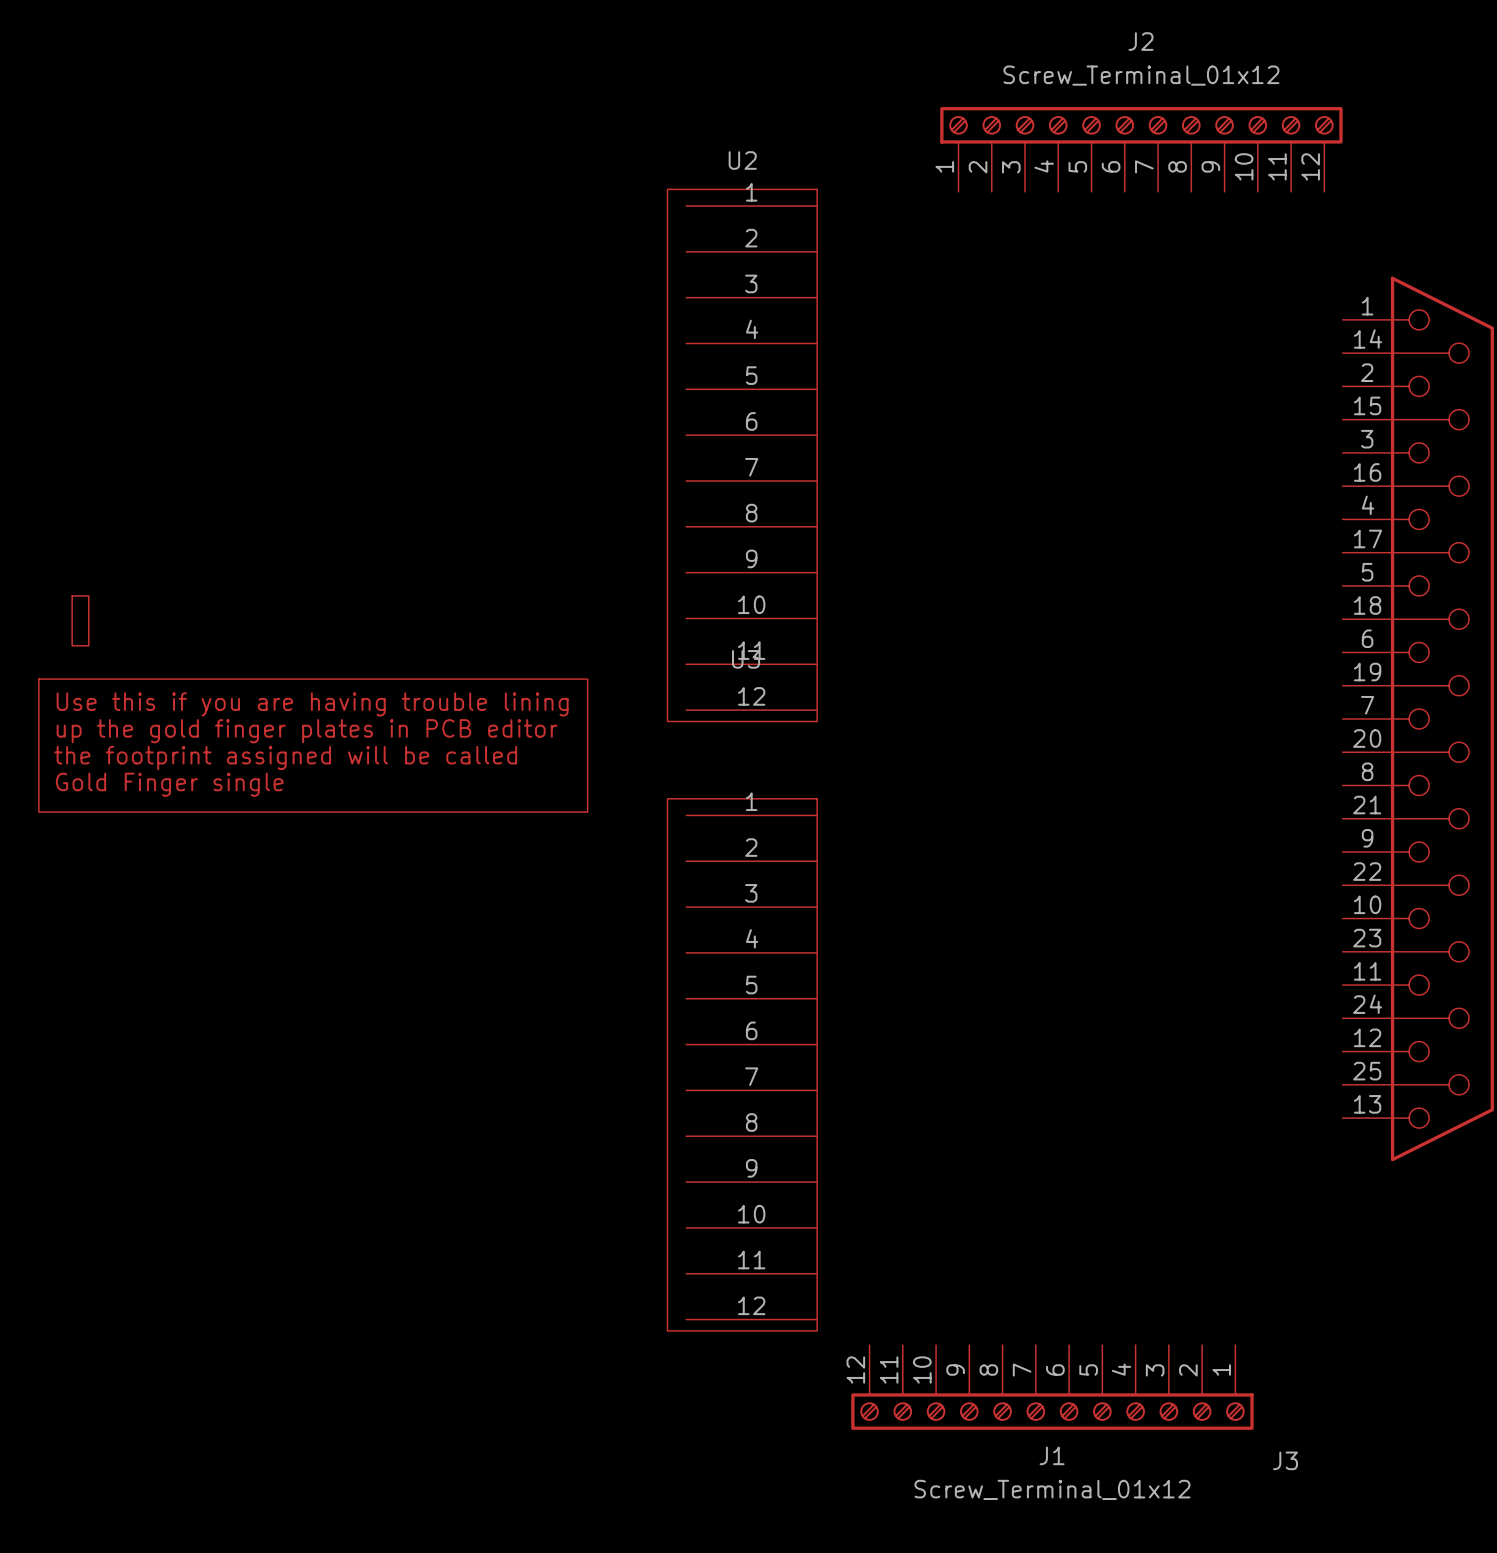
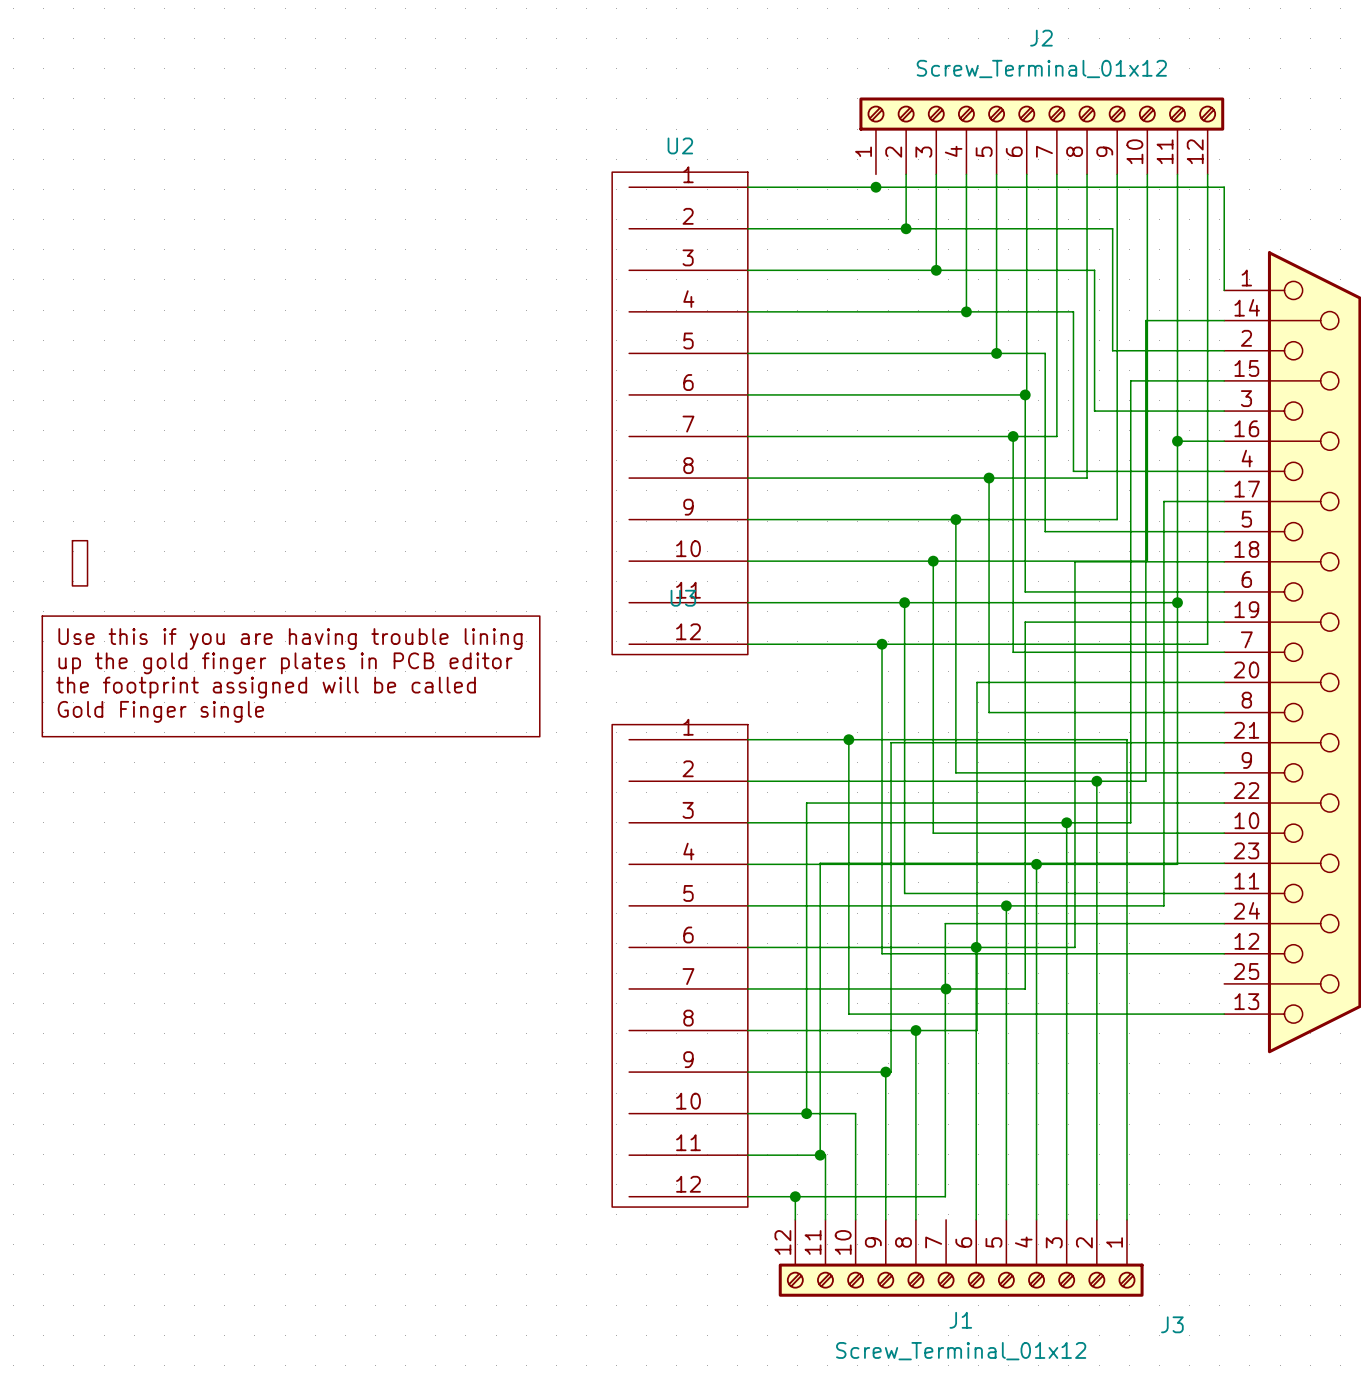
wire: none -> (906, 174) (906, 228)
wire: none -> (936, 174) (936, 270)
wire: none -> (966, 174) (966, 311)
wire: none -> (996, 174) (996, 353)
wire: none -> (1026, 174) (1026, 394) (747, 394)
wire: none -> (1056, 174) (1056, 436) (747, 436)
wire: none -> (1087, 174) (1087, 478) (747, 478)
wire: none -> (1117, 174) (1117, 519) (747, 519)
wire: none -> (1147, 174) (1147, 561) (747, 561)
wire: none -> (1177, 174) (1177, 864) (747, 864)
wire: none -> (1207, 174) (1207, 644) (747, 644)
wire: none -> (747, 187) (1224, 187) (1224, 290)
junction: none -> (875, 187)
wire: none -> (747, 228) (1112, 228) (1112, 350) (1224, 350)
junction: none -> (906, 228)
wire: none -> (747, 270) (1094, 270) (1094, 411) (1224, 411)
junction: none -> (936, 270)
wire: none -> (747, 311) (1073, 311) (1073, 471) (1224, 471)
junction: none -> (966, 311)
wire: none -> (1224, 320) (1145, 320) (1145, 781) (747, 781)
wire: none -> (747, 353) (1045, 353) (1045, 531) (1224, 531)
junction: none -> (996, 353)
wire: none -> (1224, 380) (1130, 380) (1130, 822) (747, 822)
wire: none -> (1025, 394) (1025, 591) (1224, 591)
junction: none -> (1025, 394)
wire: none -> (1013, 436) (1013, 652) (1224, 652)
junction: none -> (1013, 436)
wire: none -> (1177, 441) (1224, 441)
junction: none -> (1177, 441)
wire: none -> (989, 478) (989, 712) (1224, 712)
junction: none -> (989, 478)
wire: none -> (1224, 501) (1163, 501) (1163, 905) (747, 905)
wire: none -> (955, 519) (955, 772) (1224, 772)
junction: none -> (955, 519)
wire: none -> (933, 561) (933, 833) (1224, 833)
junction: none -> (933, 561)
wire: none -> (1224, 561) (1074, 561) (1074, 947) (747, 947)
wire: none -> (747, 602) (1177, 602)
wire: none -> (904, 602) (904, 893) (1224, 893)
junction: none -> (904, 602)
junction: none -> (1177, 602)
wire: none -> (1224, 622) (1025, 622) (1025, 988) (747, 988)
wire: none -> (882, 644) (882, 953) (1224, 953)
junction: none -> (882, 644)
wire: none -> (1224, 682) (976, 682) (976, 1030) (747, 1030)
wire: none -> (747, 739) (1126, 739) (1126, 1219)
wire: none -> (848, 739) (848, 1014) (1224, 1014)
junction: none -> (848, 739)
wire: none -> (1224, 742) (891, 742) (891, 1072) (747, 1072)
wire: none -> (1096, 781) (1096, 1219)
junction: none -> (1096, 781)
wire: none -> (1224, 803) (806, 803) (806, 1113)
wire: none -> (1066, 822) (1066, 1219)
junction: none -> (1066, 822)
wire: none -> (1224, 863) (820, 863) (820, 1155)
wire: none -> (1036, 864) (1036, 1219)
junction: none -> (1036, 864)
wire: none -> (1006, 905) (1006, 1219)
junction: none -> (1006, 905)
wire: none -> (1224, 923) (945, 923) (945, 1196) (747, 1196)
wire: none -> (976, 947) (976, 1219)
junction: none -> (976, 947)
junction: none -> (946, 988)
wire: none -> (915, 1030) (915, 1219)
junction: none -> (915, 1030)
wire: none -> (885, 1072) (885, 1219)
junction: none -> (885, 1072)
wire: none -> (747, 1113) (855, 1113) (855, 1219)
junction: none -> (806, 1113)
wire: none -> (747, 1155) (825, 1155) (825, 1219)
junction: none -> (820, 1155)
wire: none -> (795, 1196) (795, 1219)
junction: none -> (795, 1196)

